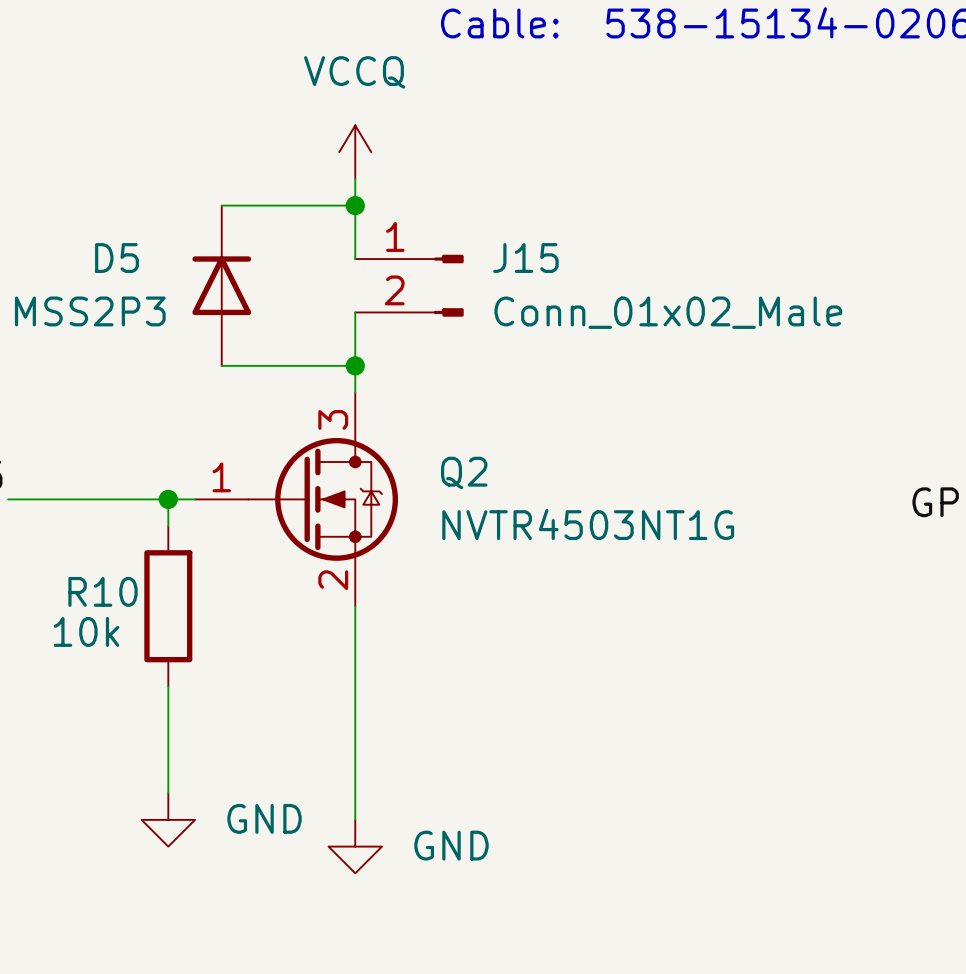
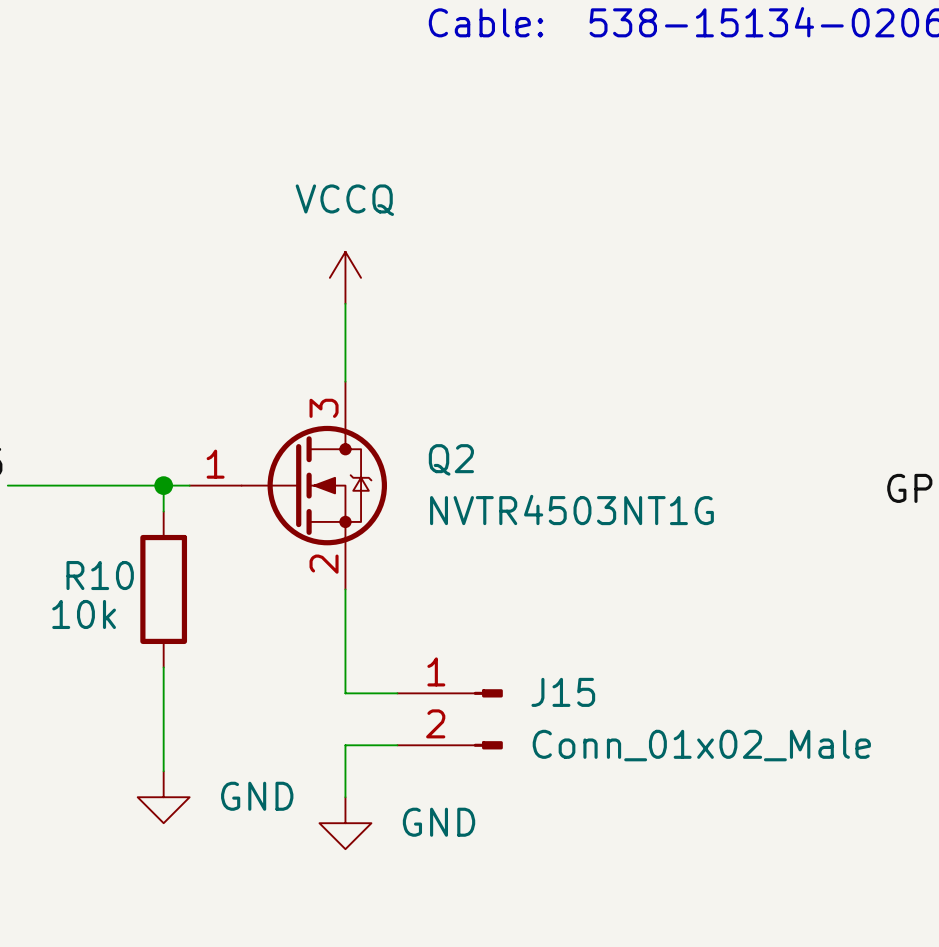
power symbol position: VCCQ (355, 152) -> VCCQ (345, 277)
wire: (355, 178) (355, 259) -> none
wire: (221, 205) (355, 205) -> none
junction: (355, 205) -> none
D5: MSS2P3 (221, 285) -> none
J15 position: (409, 285) -> (450, 719)
wire: (221, 365) (355, 365) -> none
junction: (355, 365) -> none
wire: (355, 713) (355, 766) -> (345, 693) (397, 693)
wire: none -> (345, 745) (397, 745)

